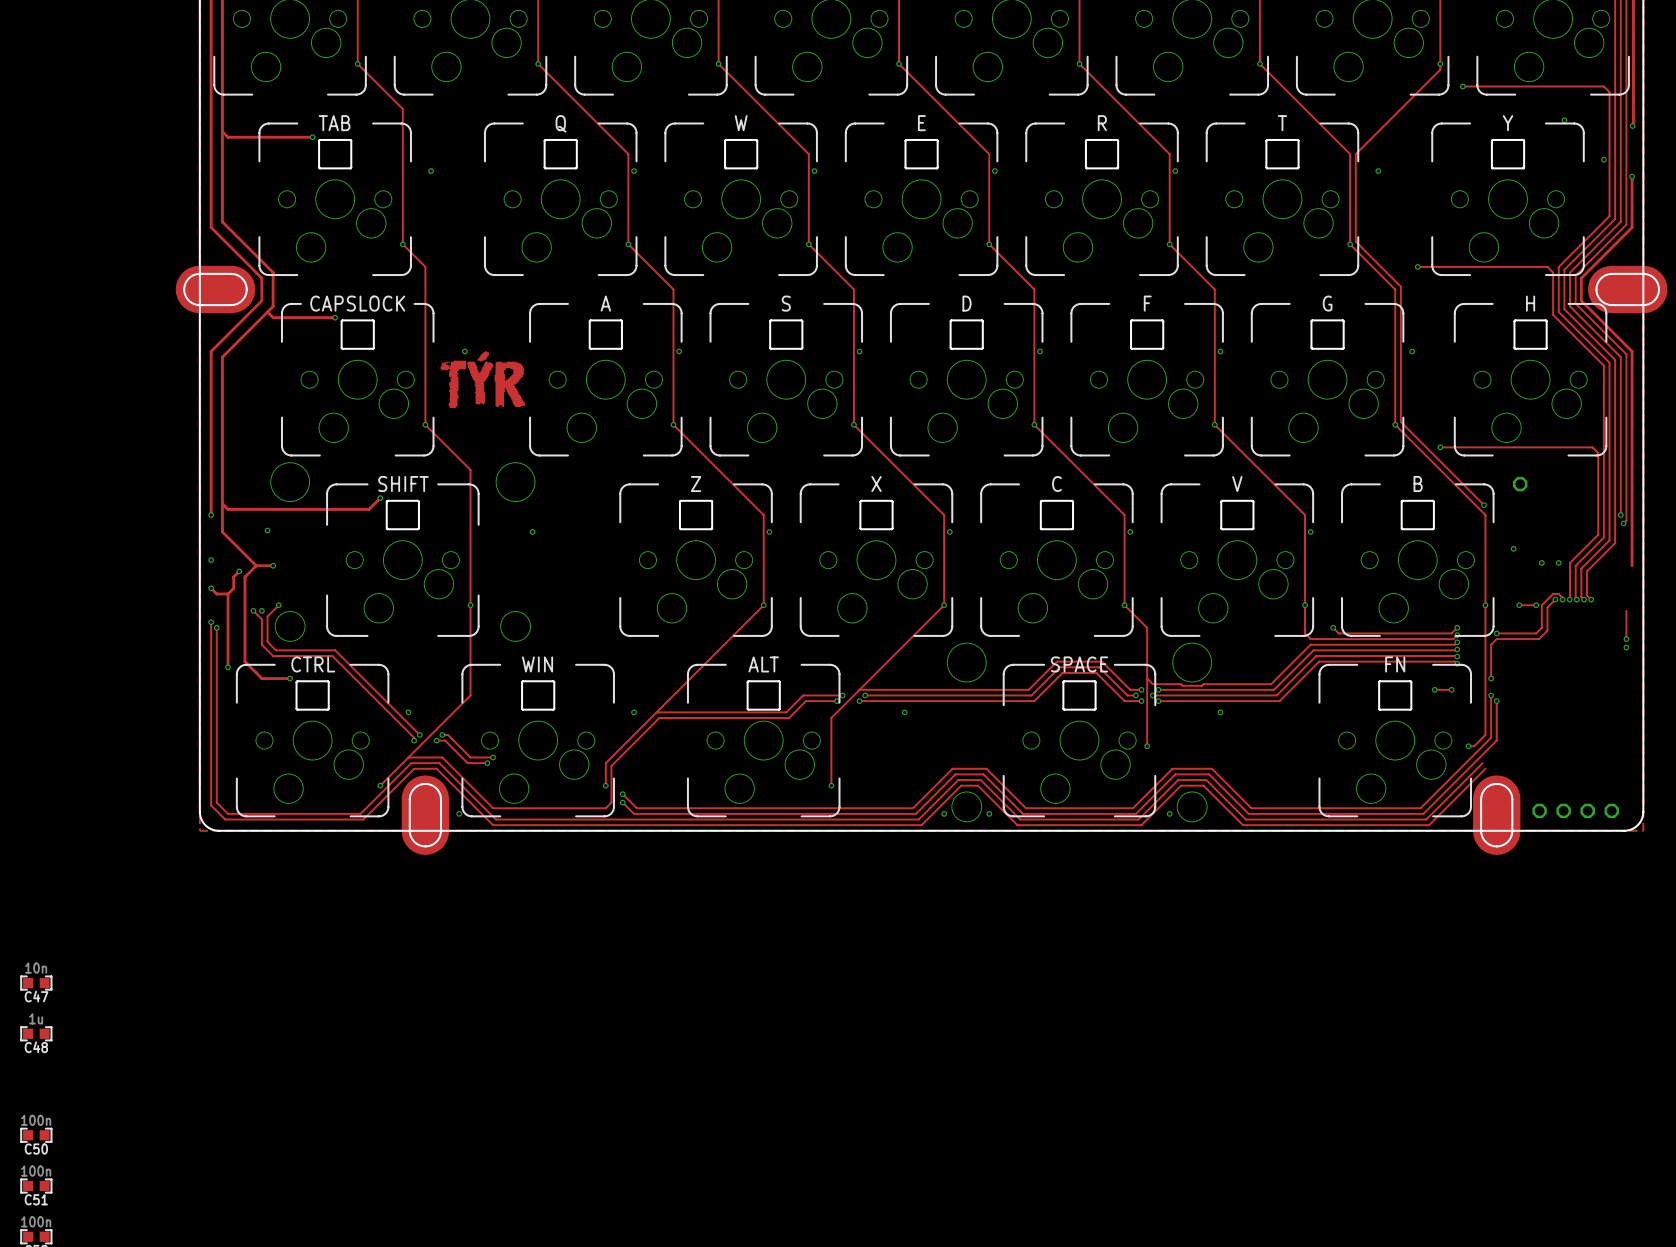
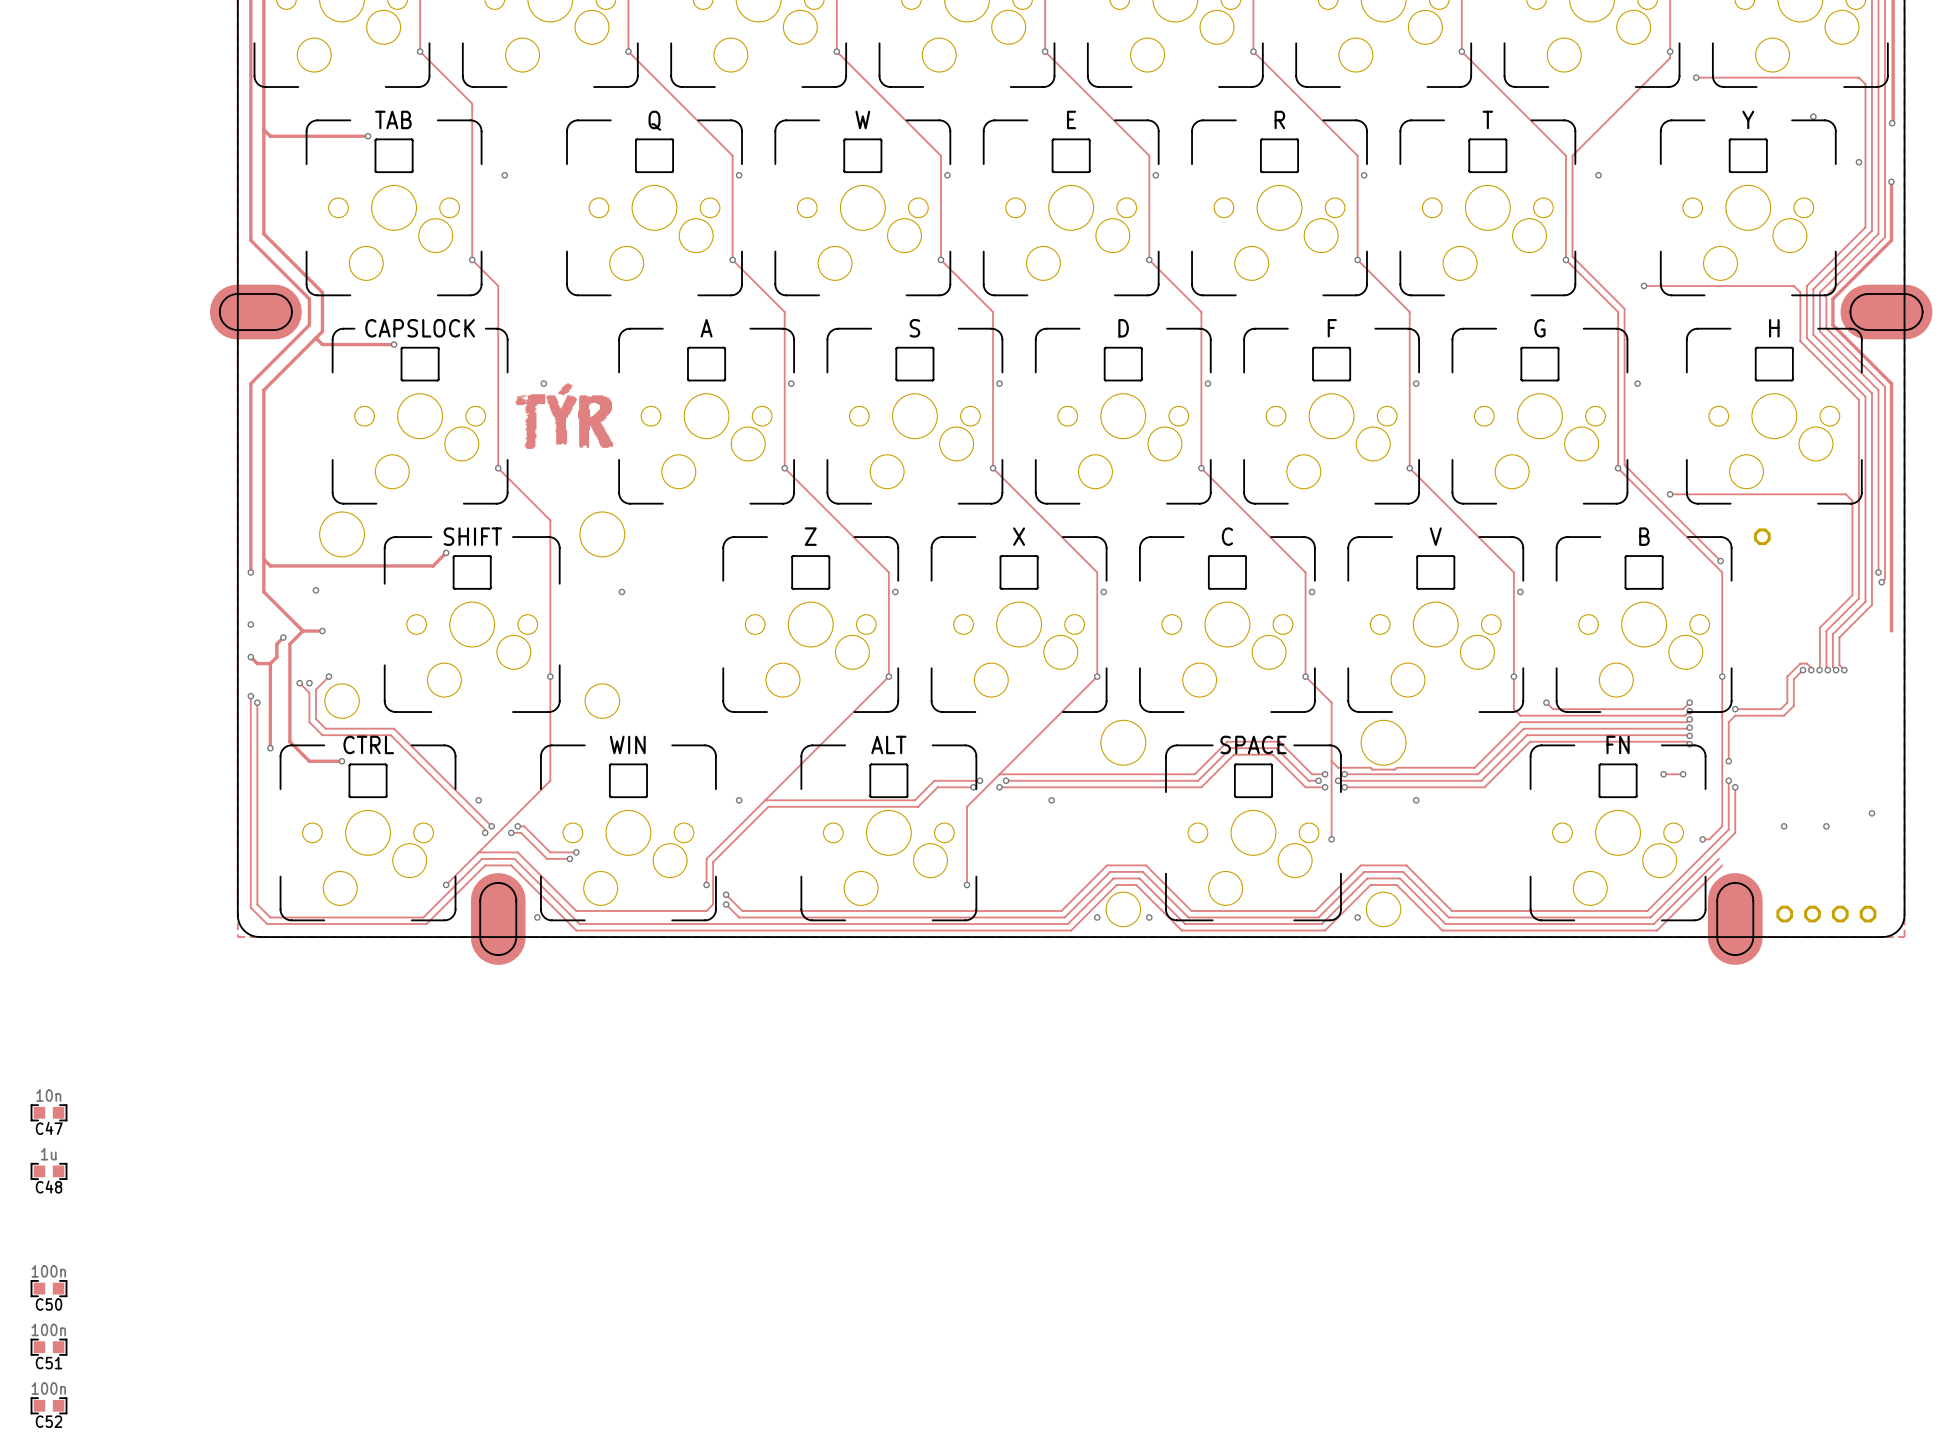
via: (1513, 548) -> none
via: (1541, 562) -> none
via: (1558, 562) -> none
track: (1519, 605) (1536, 605) -> none
via: (1519, 605) -> none
via: (1536, 605) -> none
track: (1626, 610) (1626, 639) -> none
via: (1626, 639) -> none
via: (1626, 647) -> none
via: none -> (1871, 813)
via: none -> (1784, 826)
via: none -> (1826, 826)

